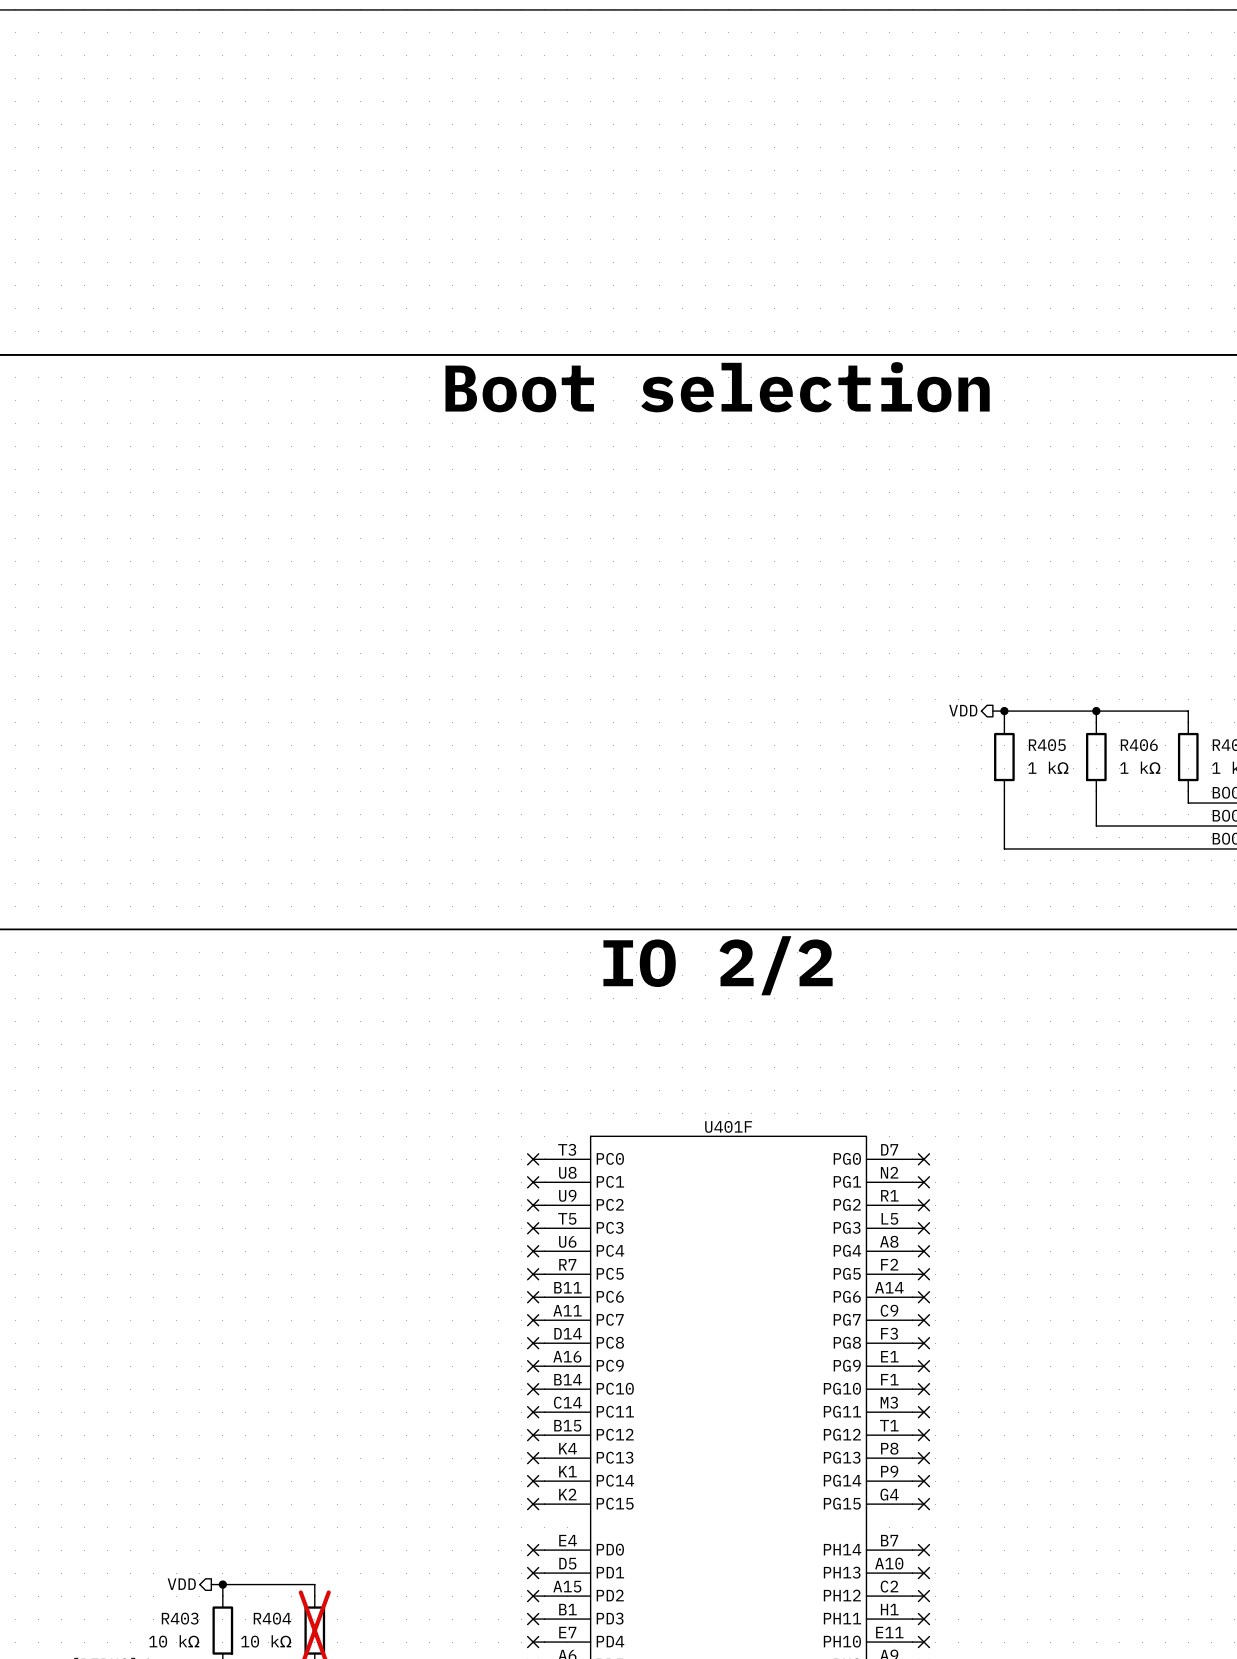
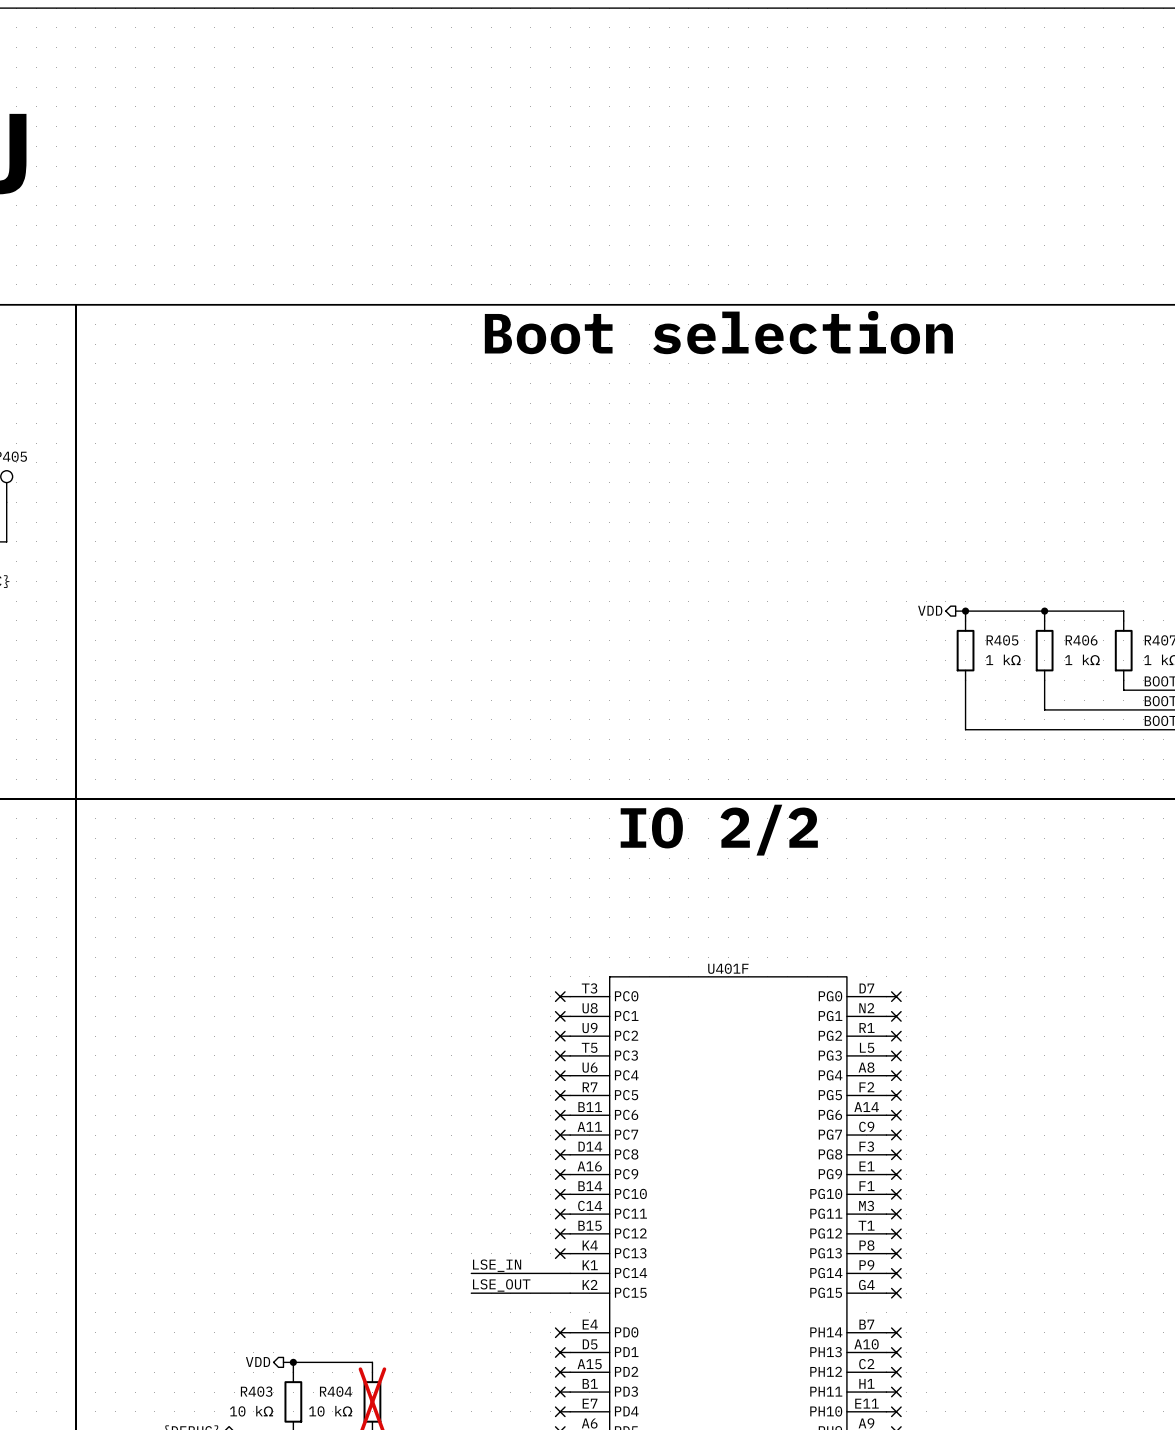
label: none -> LSE_IN (497, 1265)
wire: none -> (471, 1273) (560, 1273)
no-connect mark: (533, 1481) -> none
label: none -> LSE_OUT (501, 1285)
wire: none -> (471, 1293) (560, 1293)
no-connect mark: (533, 1504) -> none

